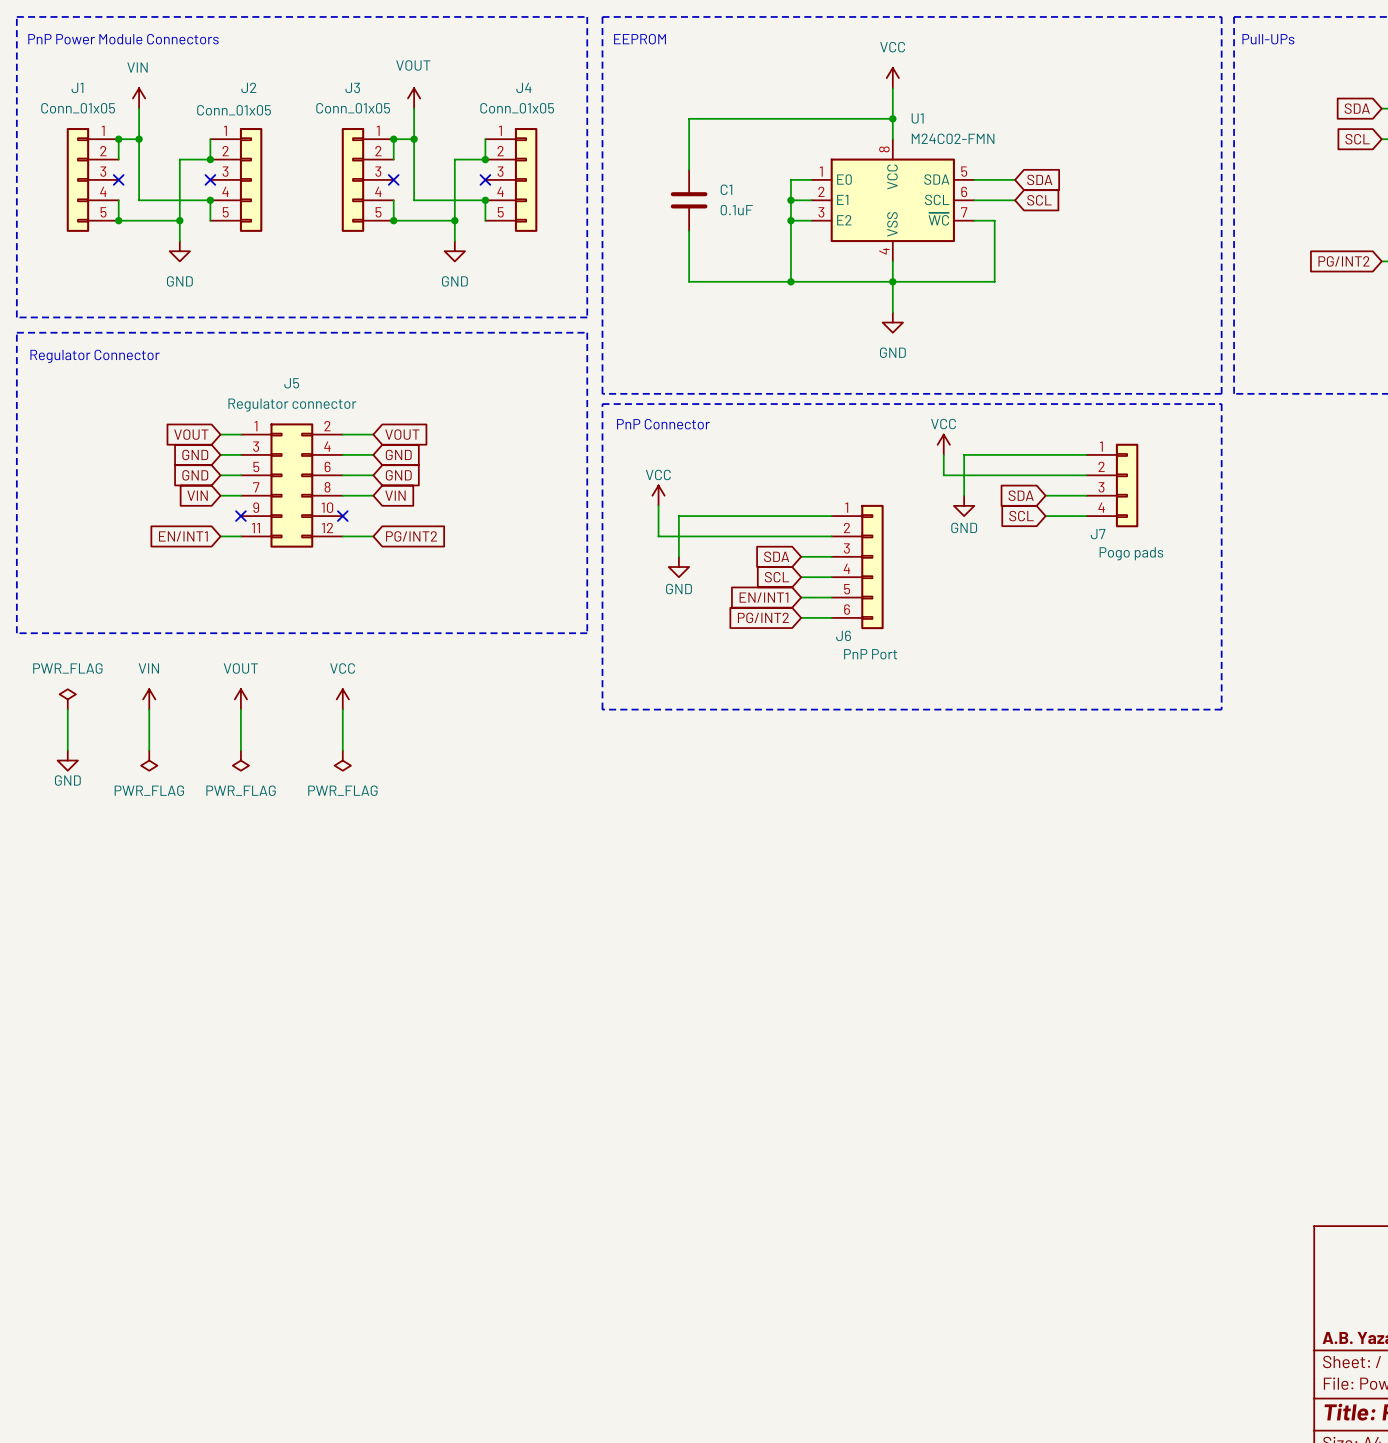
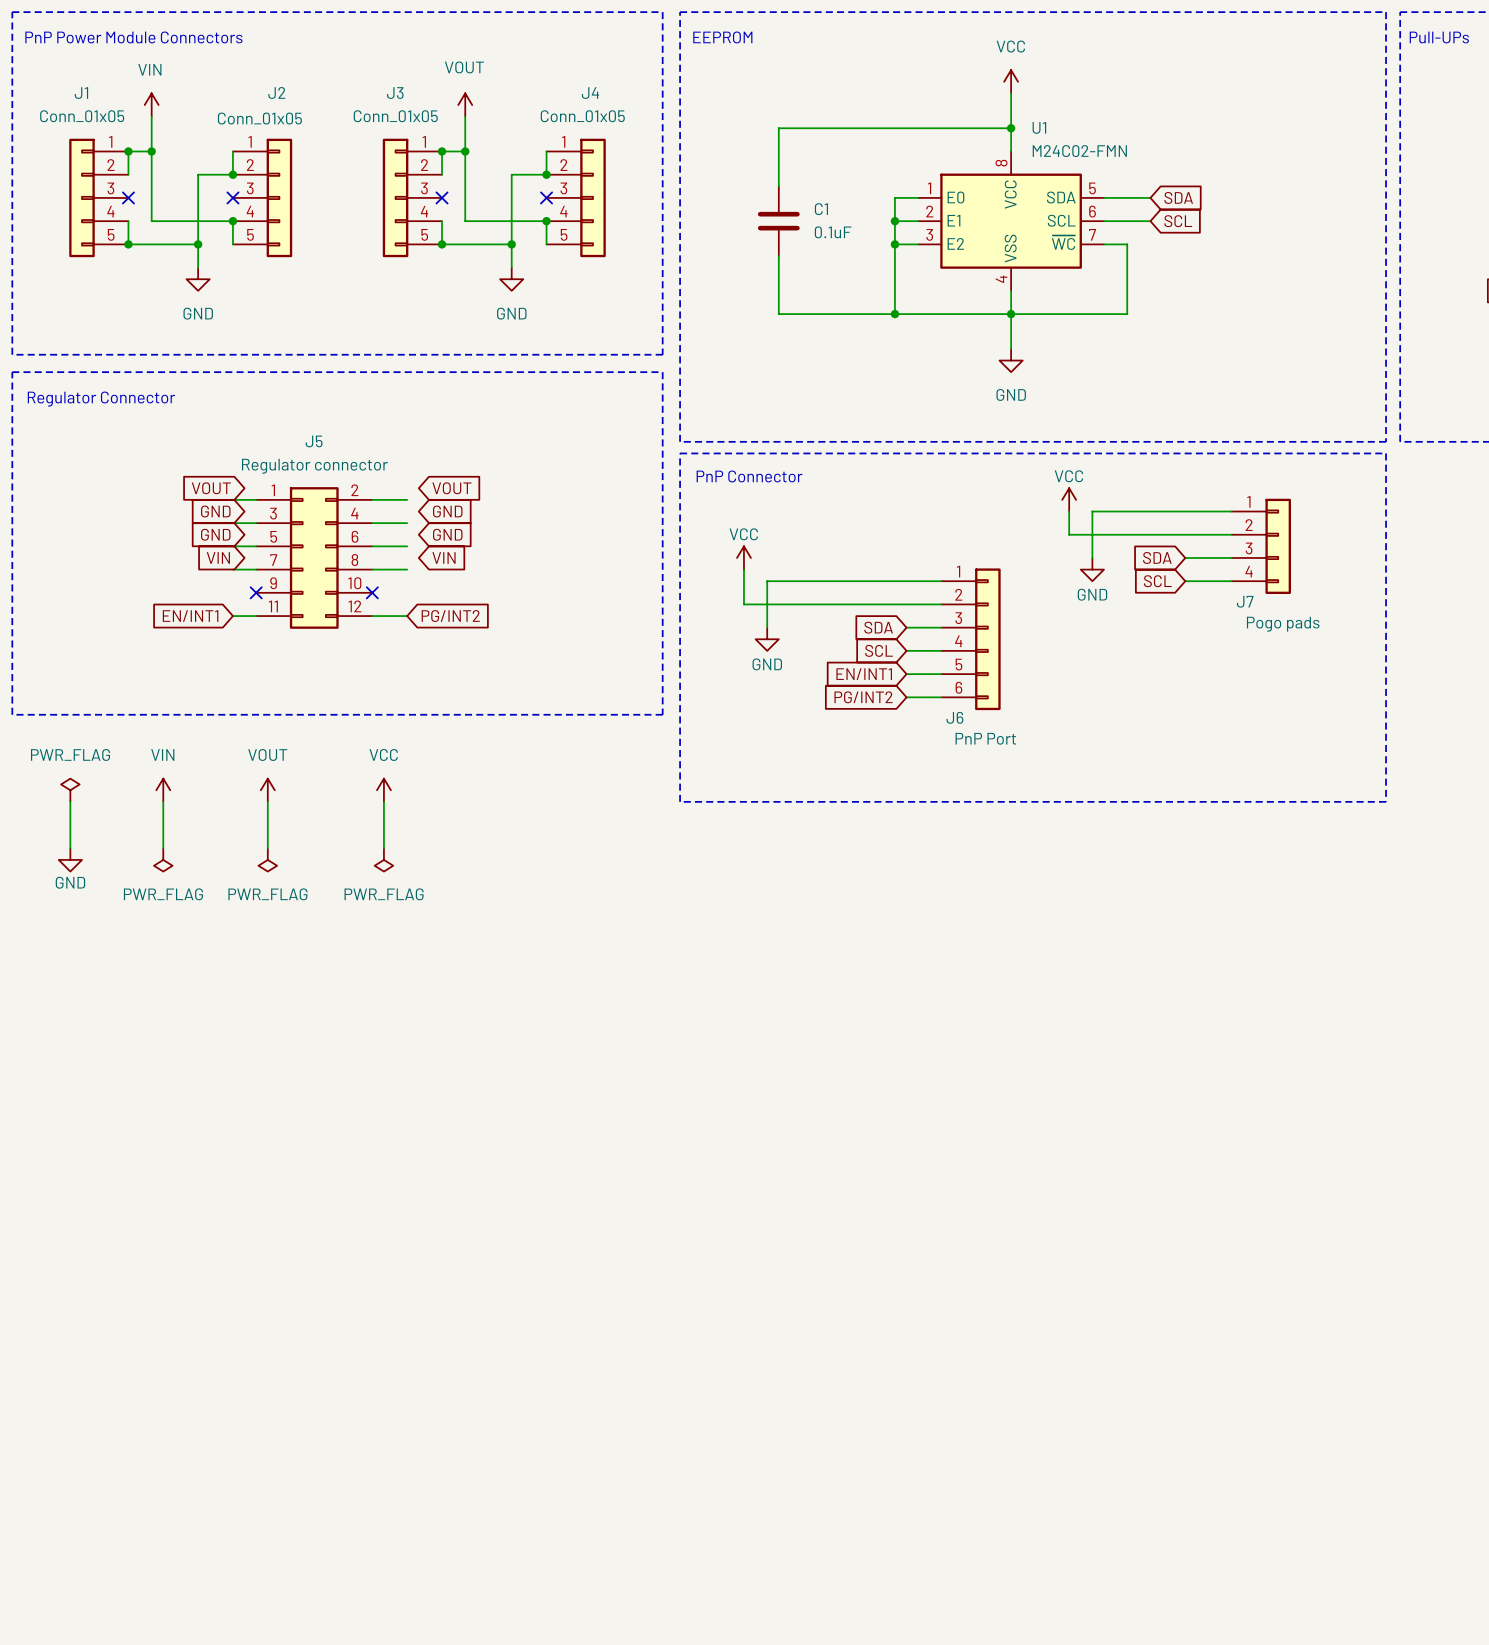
wire: (220, 434) (240, 434) -> (232, 499) (256, 499)
wire: (342, 434) (373, 434) -> (372, 499) (407, 499)
wire: (220, 454) (240, 454) -> (232, 523) (256, 523)
wire: (342, 454) (373, 454) -> (372, 523) (407, 523)
wire: (220, 475) (240, 475) -> (232, 546) (256, 546)
wire: (342, 475) (373, 475) -> (372, 546) (407, 546)
J5 position: (291, 485) -> (314, 557)
wire: (220, 495) (240, 495) -> (232, 569) (256, 569)
wire: (342, 495) (373, 495) -> (372, 569) (407, 569)
no-connect mark position: (240, 516) -> (256, 592)
no-connect mark position: (342, 516) -> (372, 592)
global label position: EN/INT1 (183, 536) -> EN/INT1 (190, 616)
wire: (220, 536) (240, 536) -> (232, 616) (256, 616)
wire: (342, 536) (373, 536) -> (372, 616) (407, 616)
global label position: PG/INT2 (411, 536) -> PG/INT2 (450, 616)

